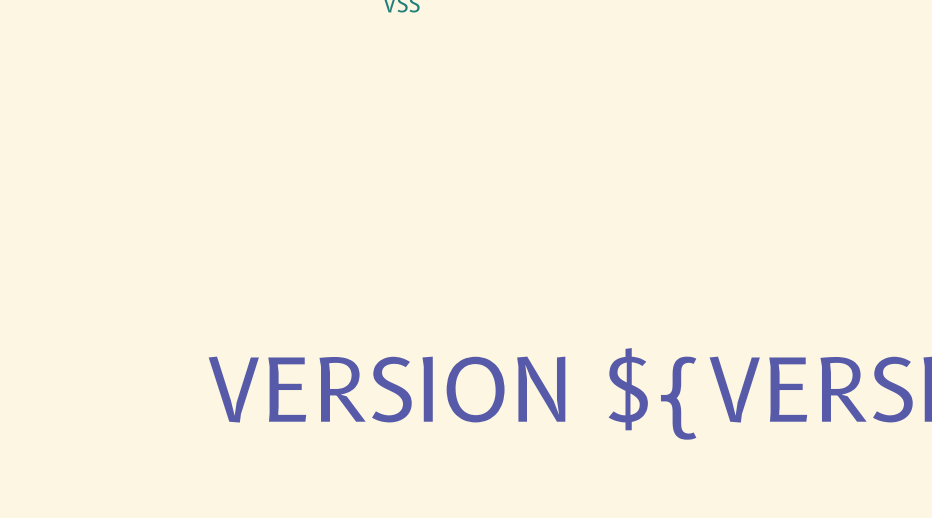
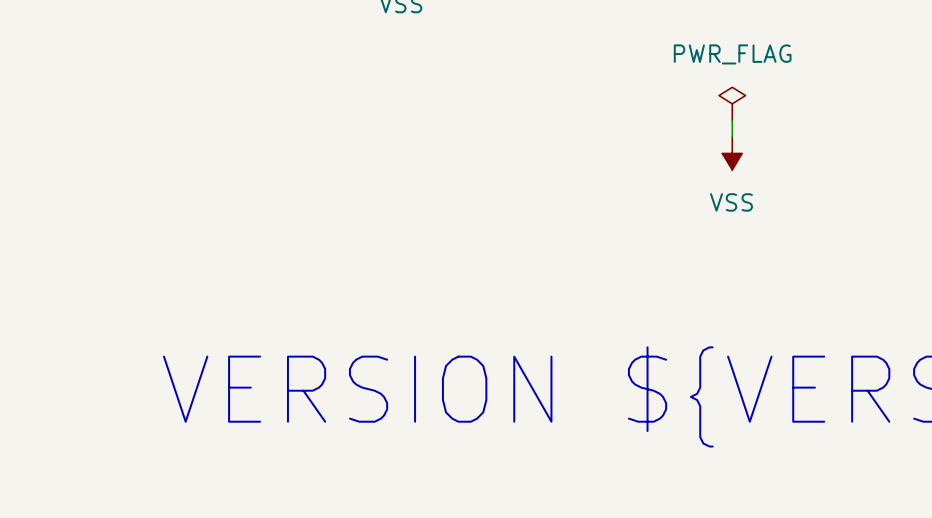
power symbol: none -> PWR_FLAG (732, 103)
wire: none -> (732, 120) (732, 136)
power symbol: none -> VSS (732, 153)

